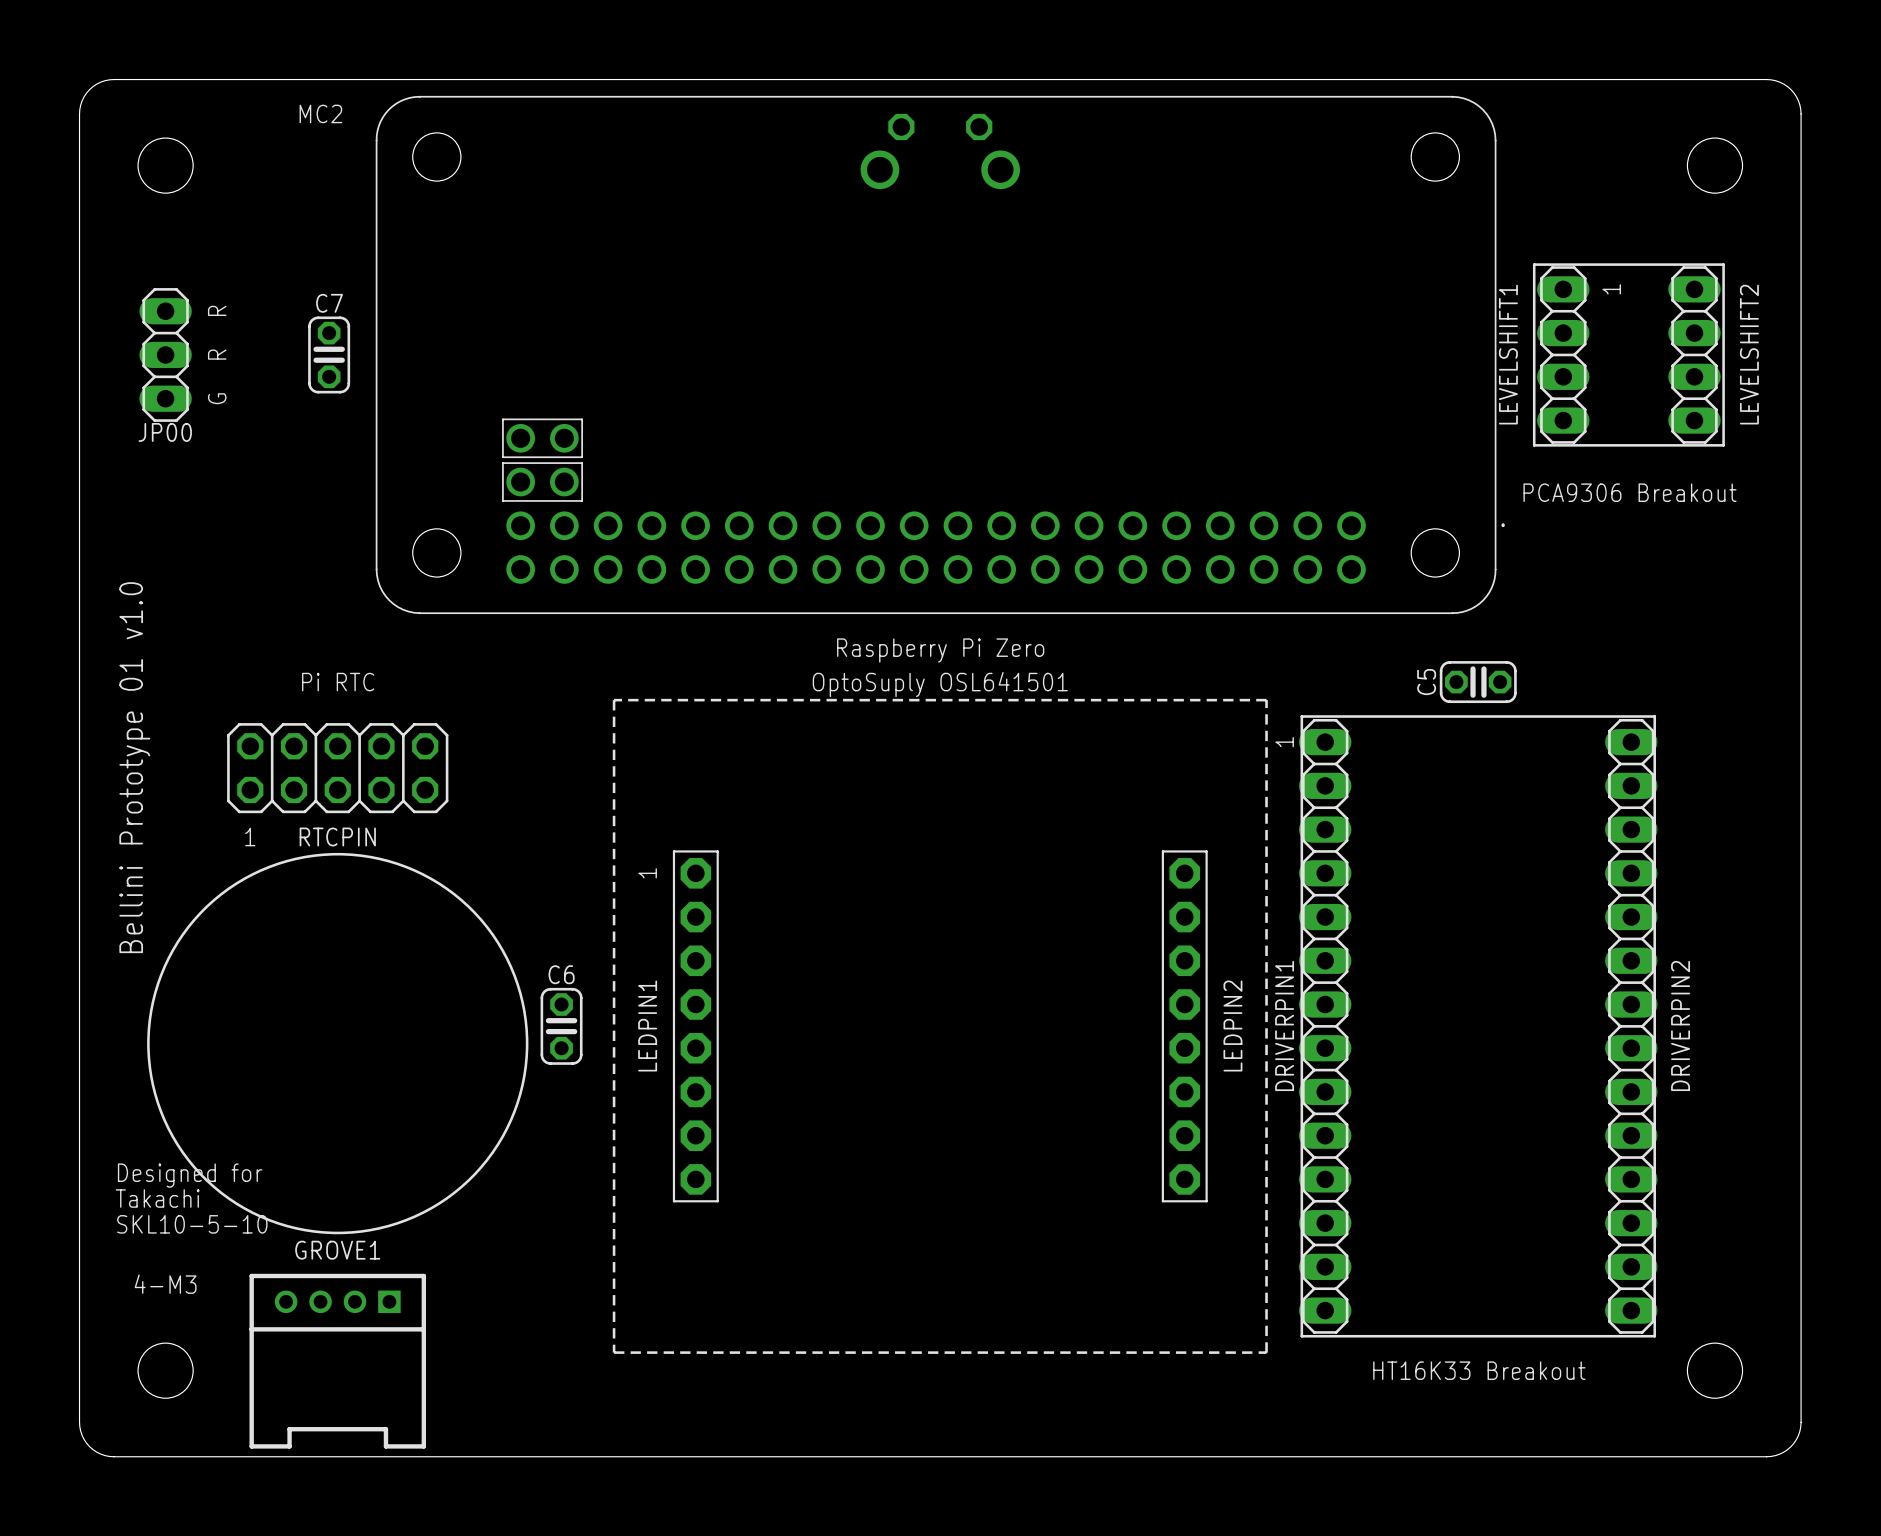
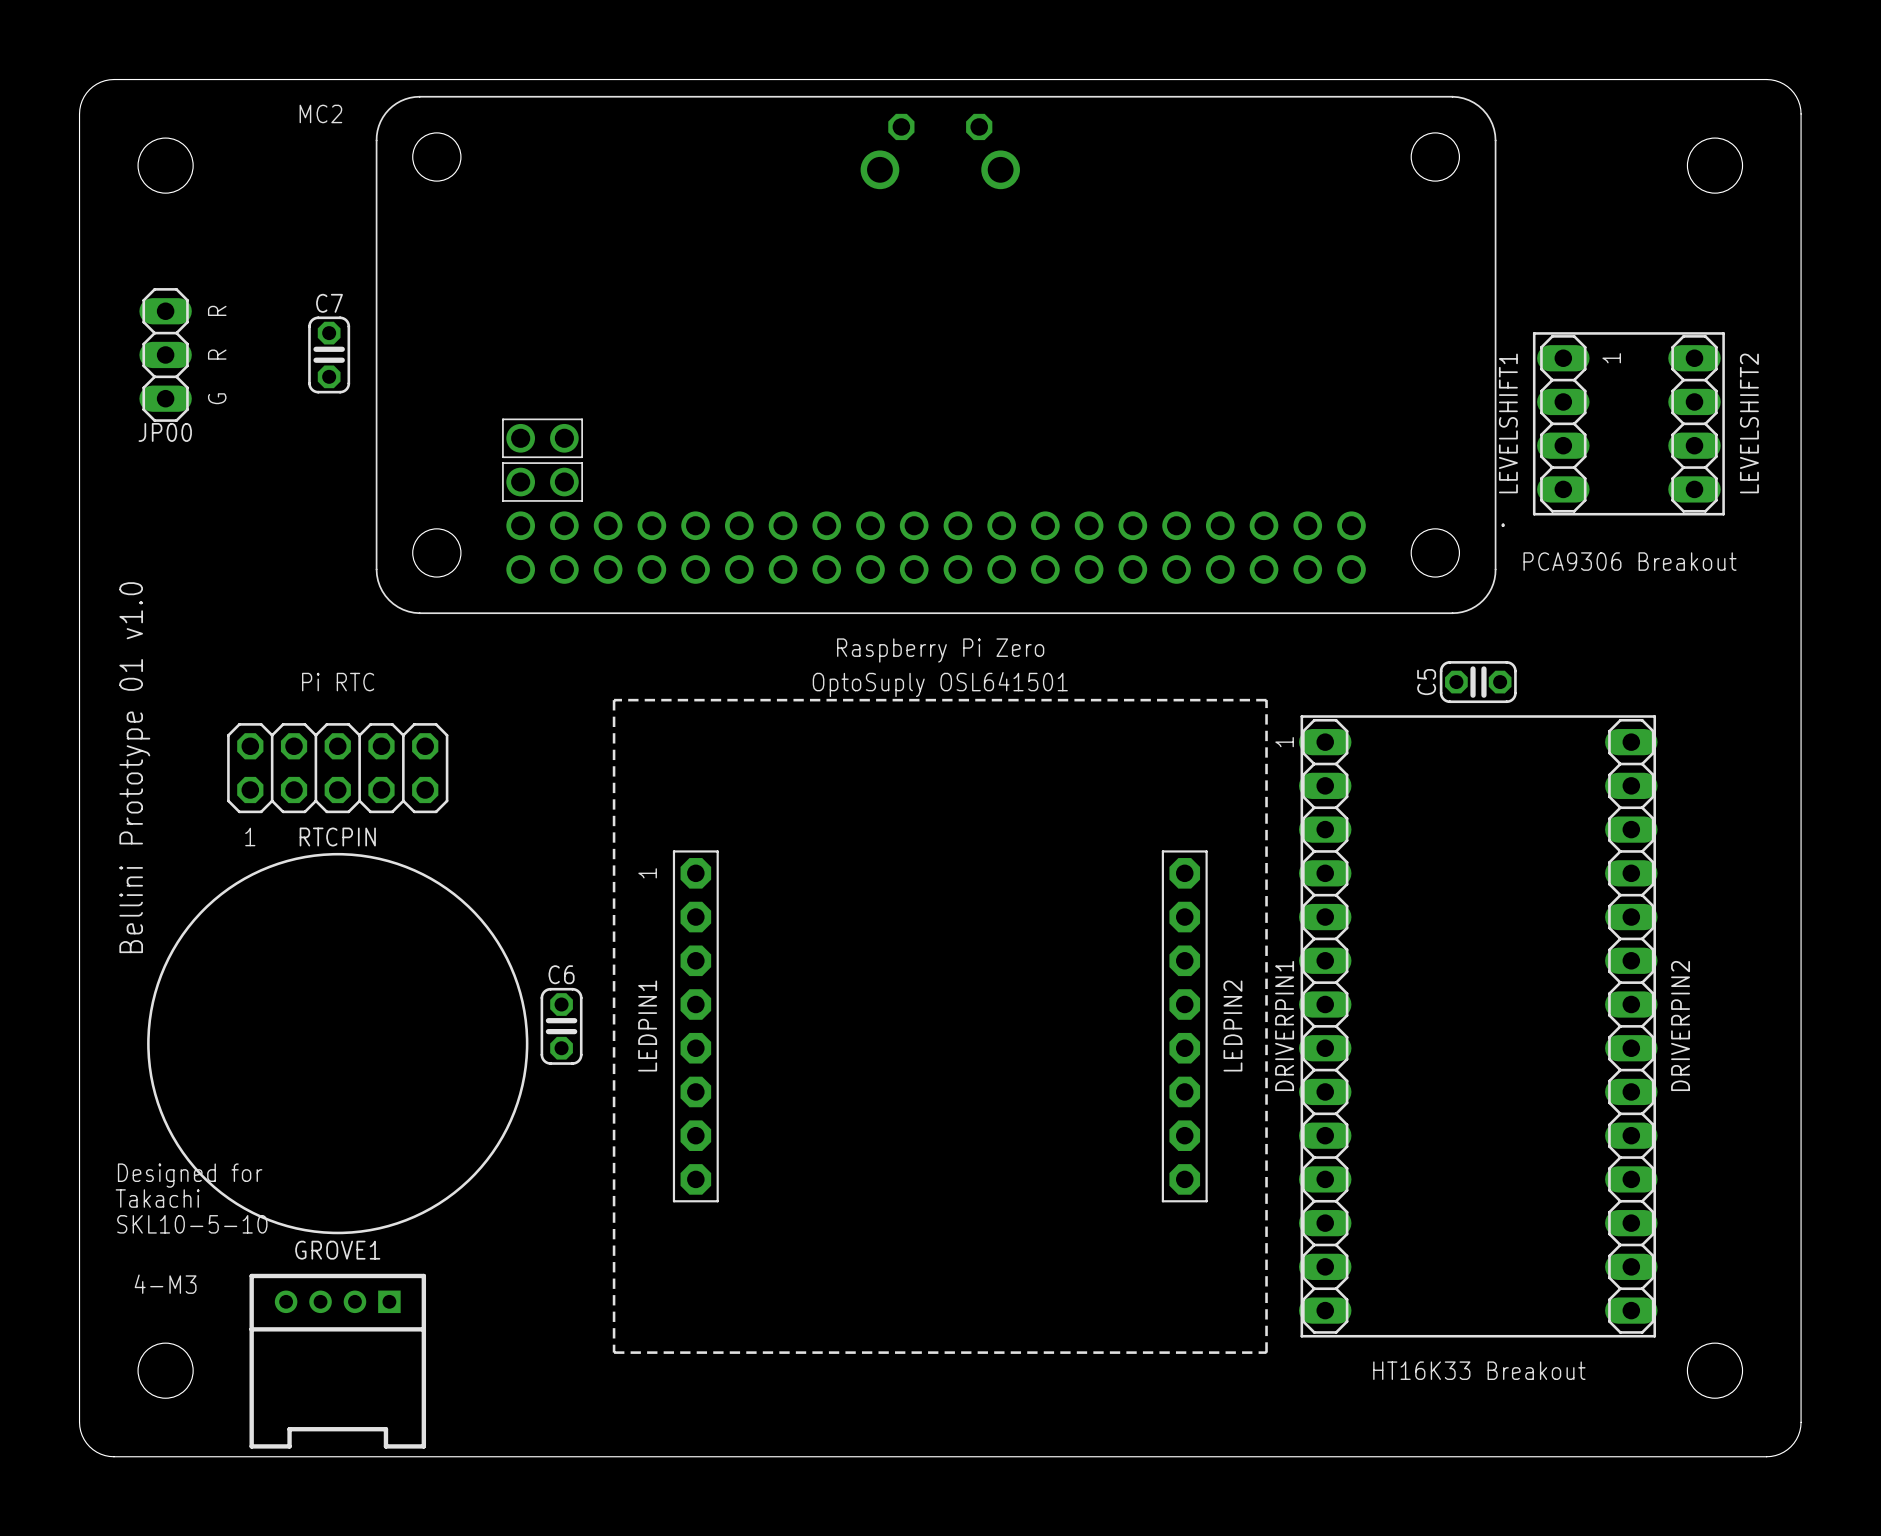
text position: 1 (1611, 289) -> 1 (1611, 358)
line: (1534, 333) (1534, 264) (1723, 264) (1723, 333) -> (1534, 333) (1723, 333)
LEVELSHIFT1 position: (1563, 354) -> (1563, 423)
LEVELSHIFT2 position: (1694, 354) -> (1694, 423)
line: (1534, 445) (1723, 445) -> (1534, 445) (1534, 514) (1723, 514) (1723, 445)
text position: PCA9306 Breakout (1630, 492) -> PCA9306 Breakout (1630, 561)

